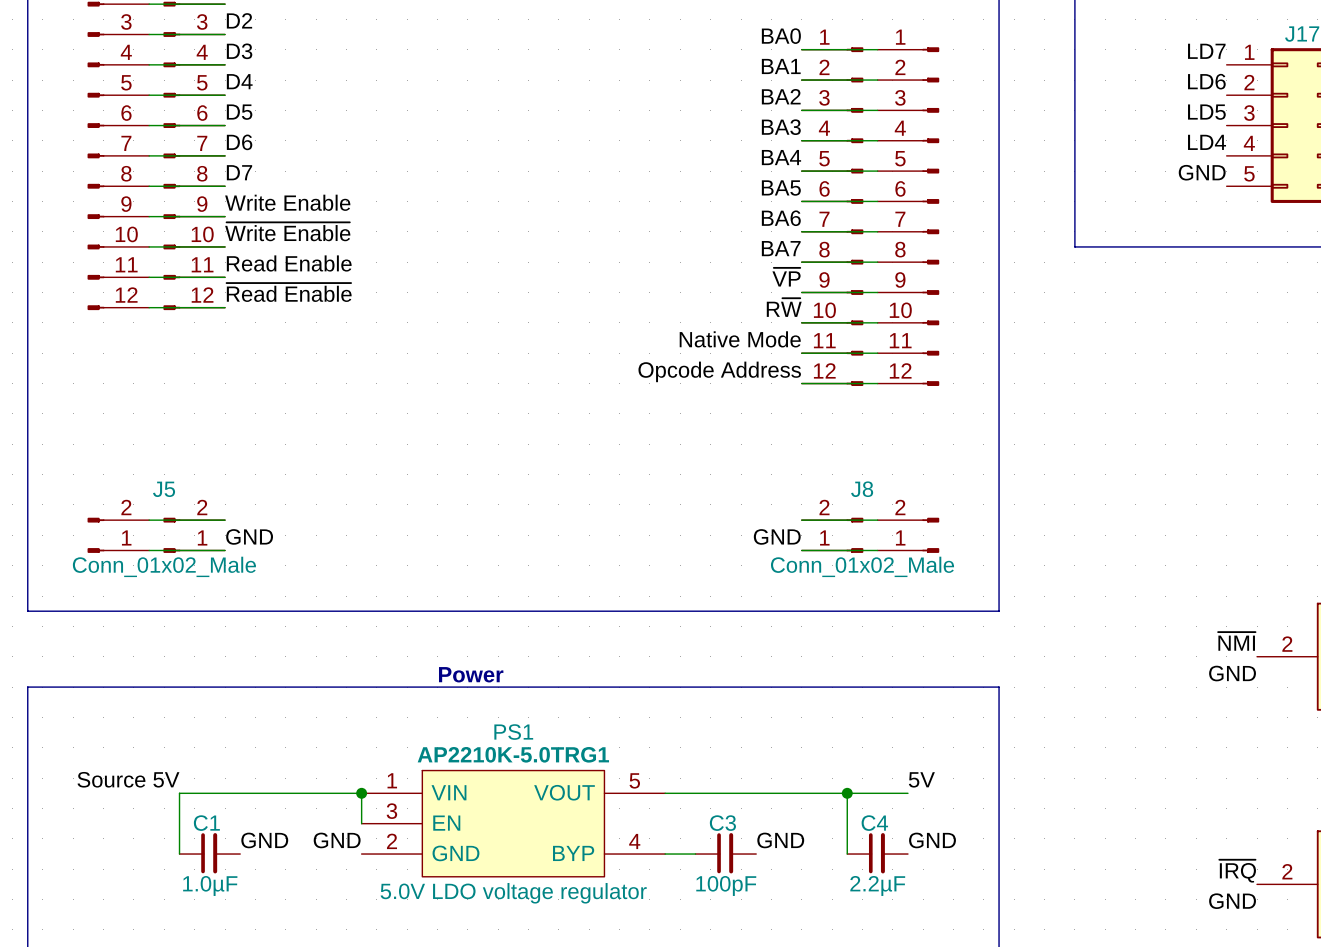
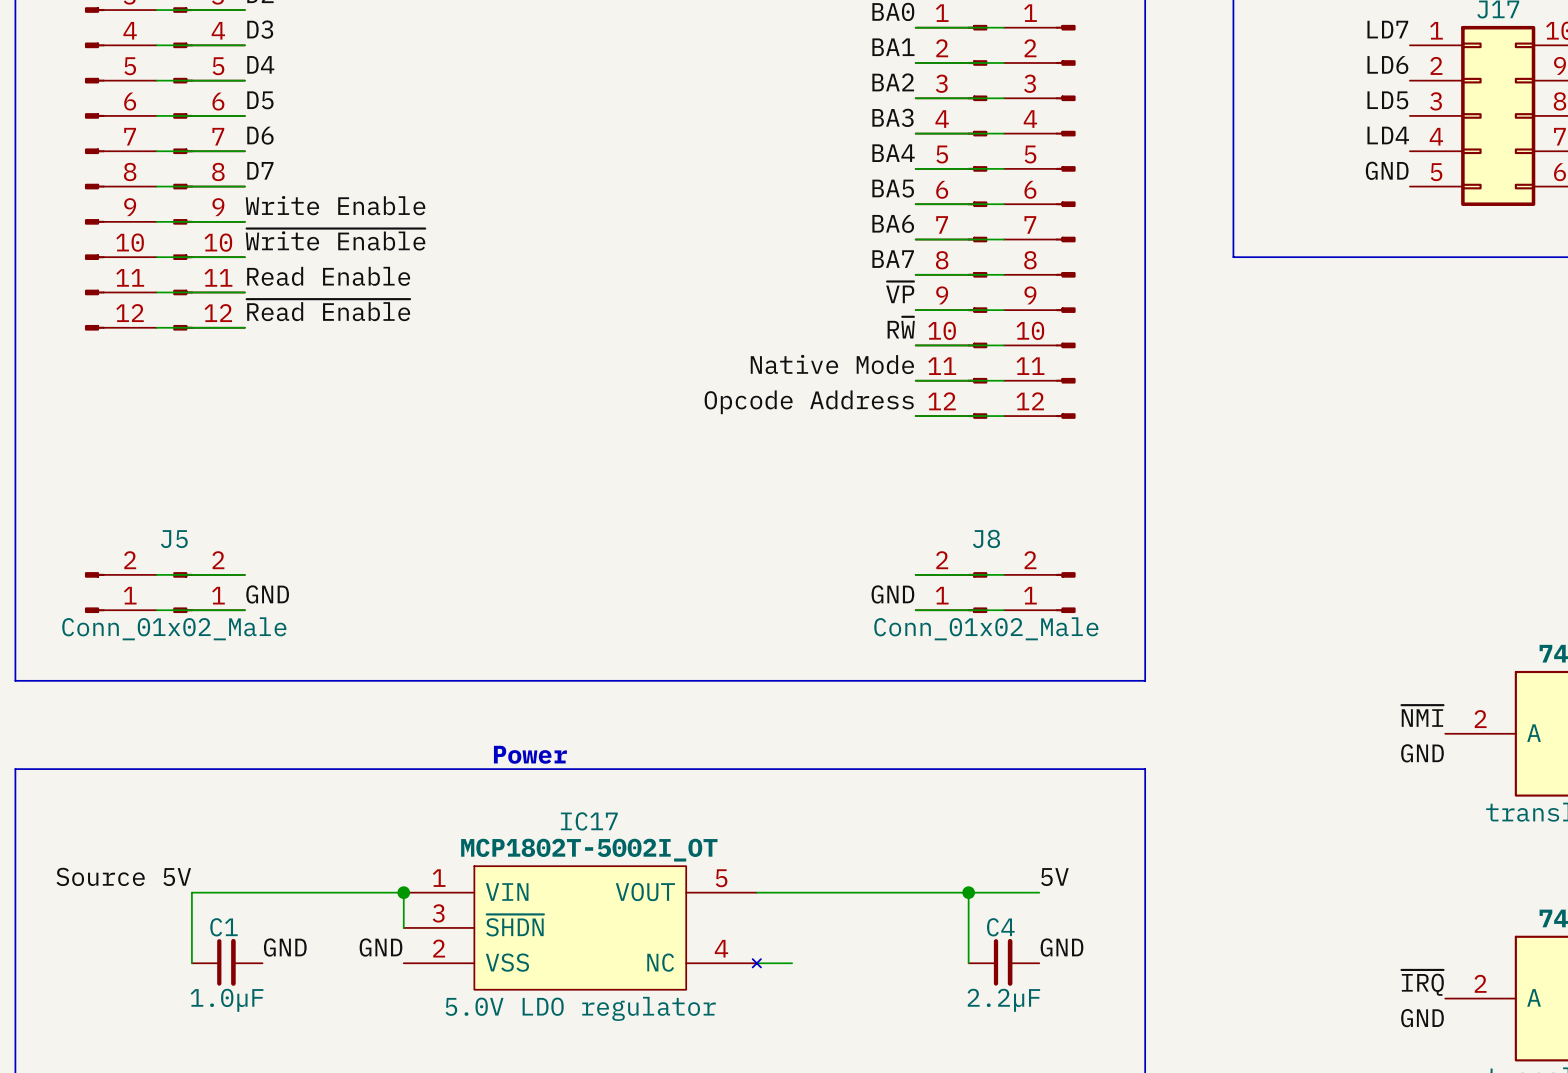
PS1: AP2210K-5.0TRG1 (513, 823) -> none
IC17: none -> MCP1802T-5002I_OT (582, 927)
label: GND (780, 840) -> none
C3: (725, 853) -> none

